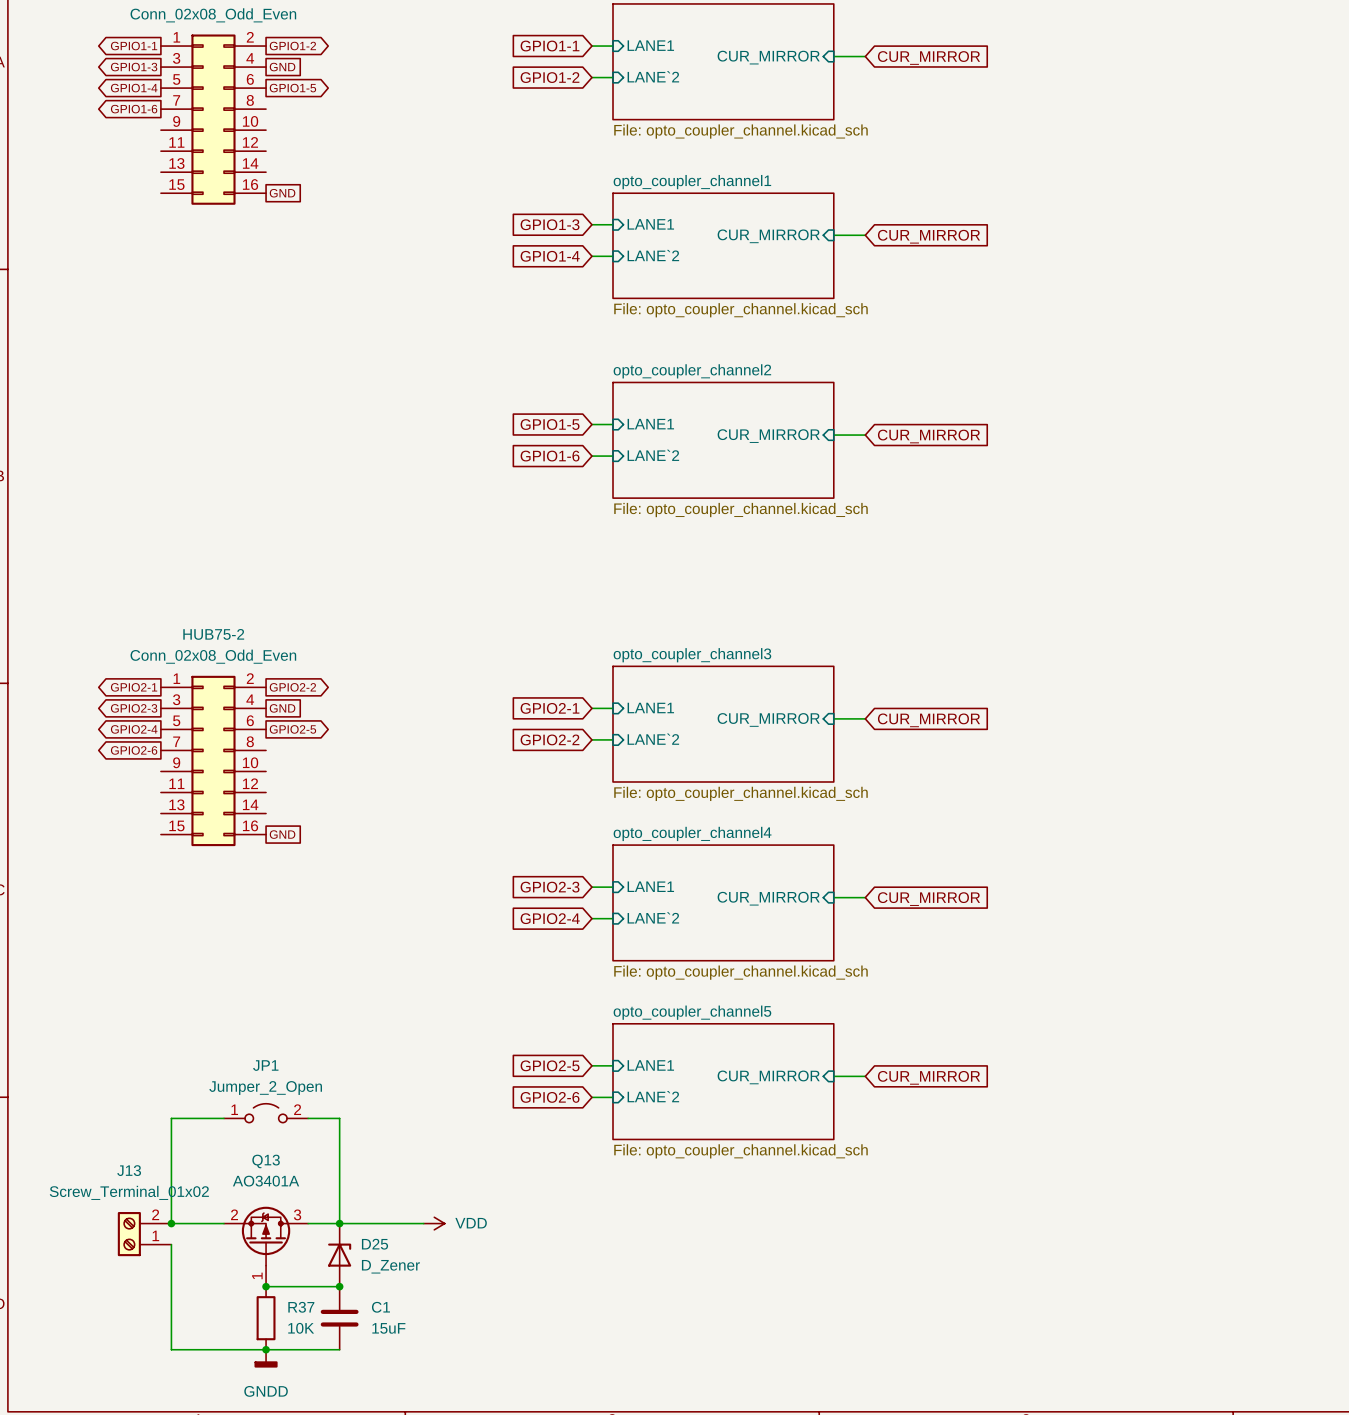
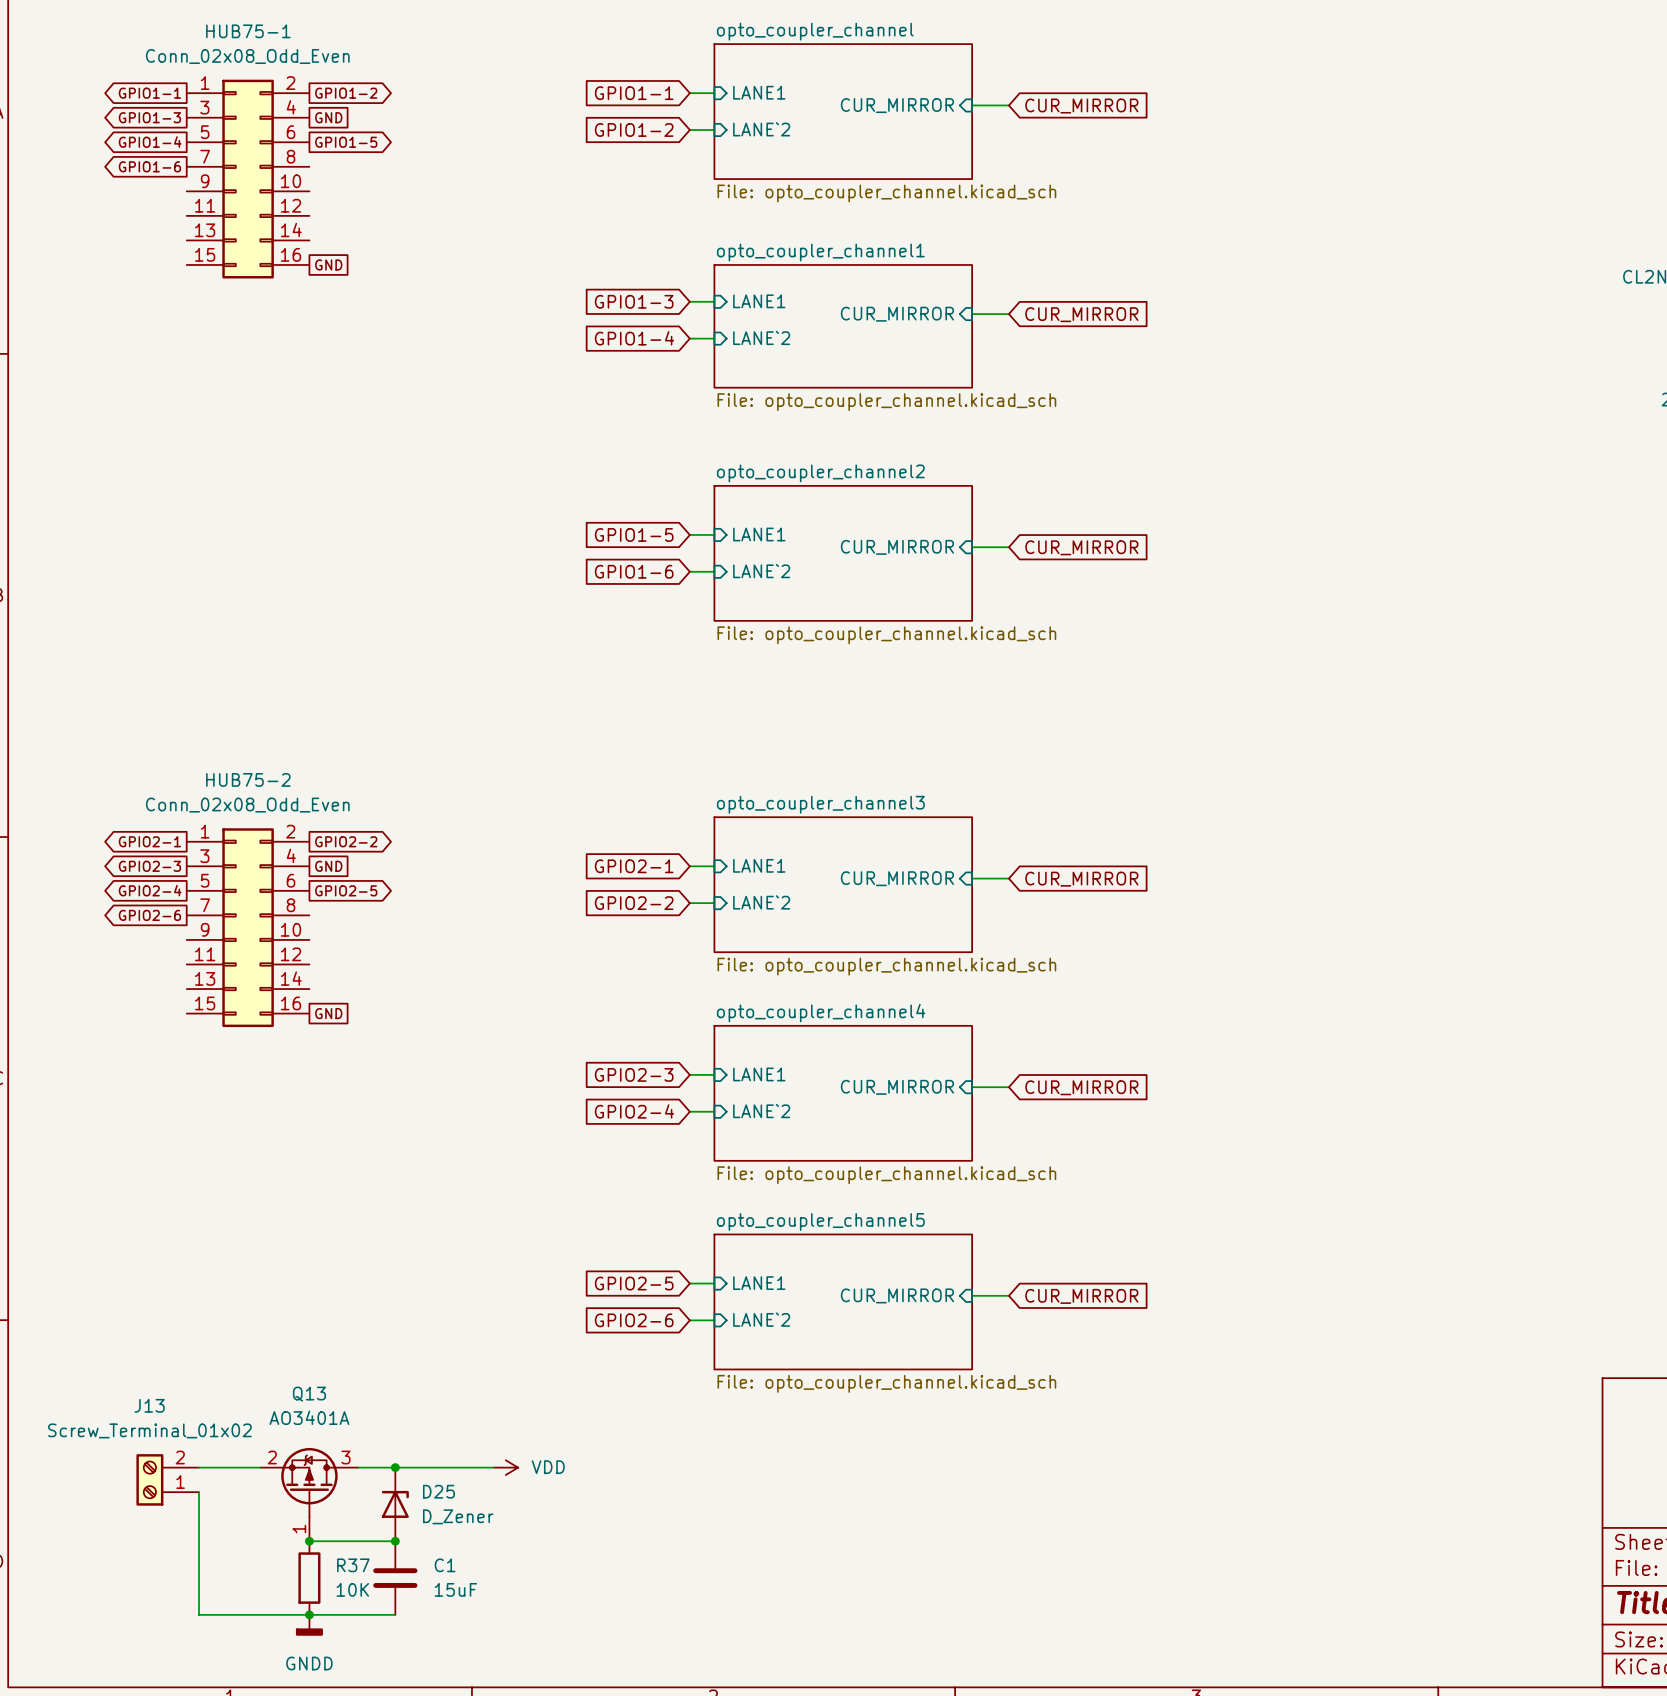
JP1: Jumper_2_Open (266, 1113) -> none
wire: (223, 1118) (171, 1118) (171, 1223) -> none
wire: (308, 1118) (339, 1118) (339, 1223) -> none
junction: (171, 1223) -> none

